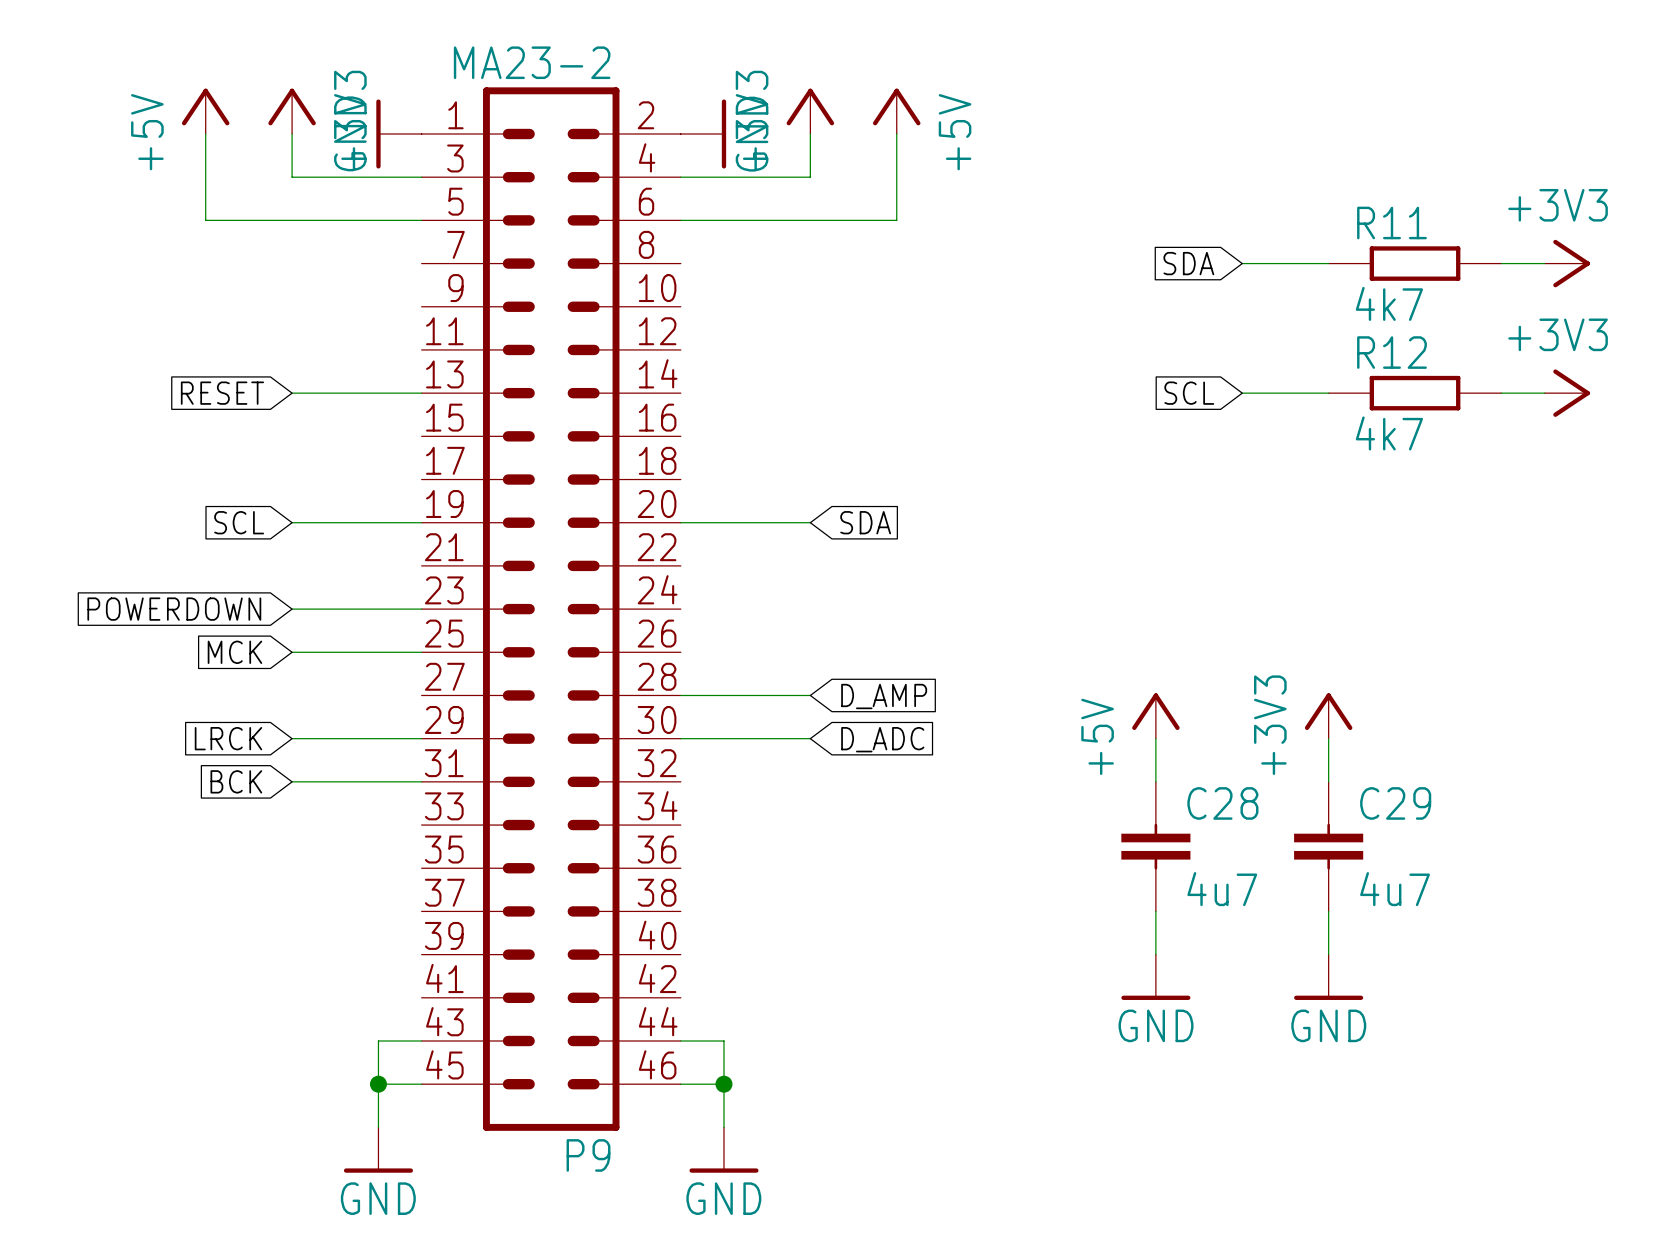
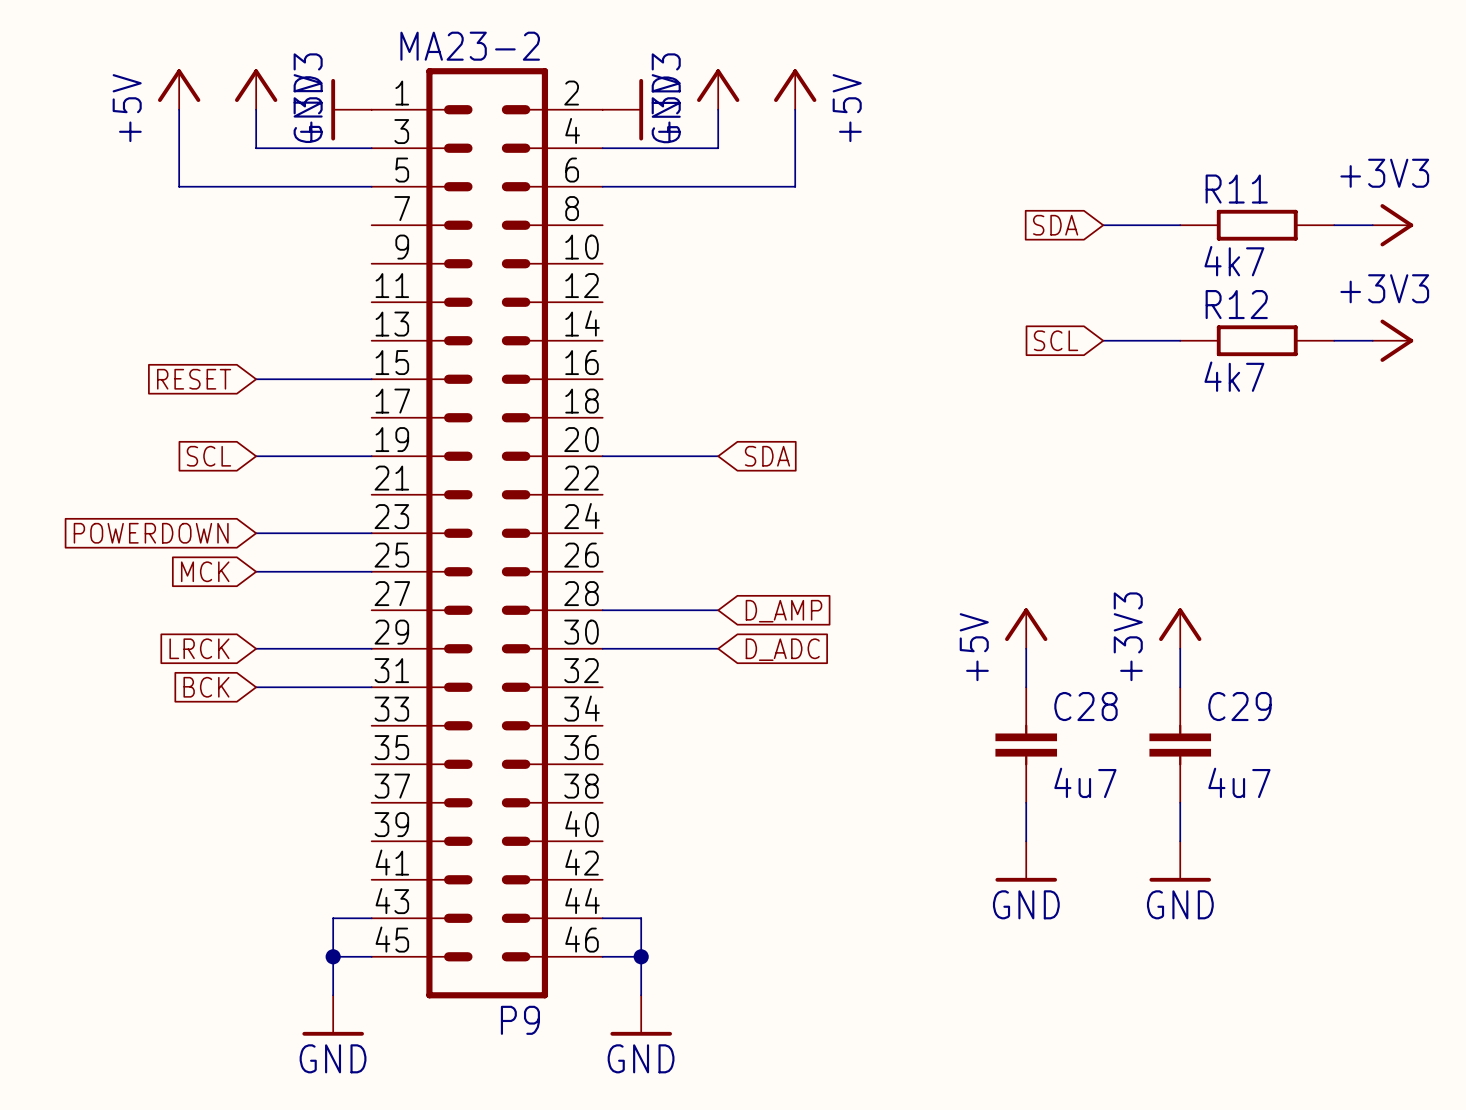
global label position: RESET (222, 393) -> RESET (194, 379)
wire: (292, 393) (421, 393) -> (256, 379) (371, 379)

